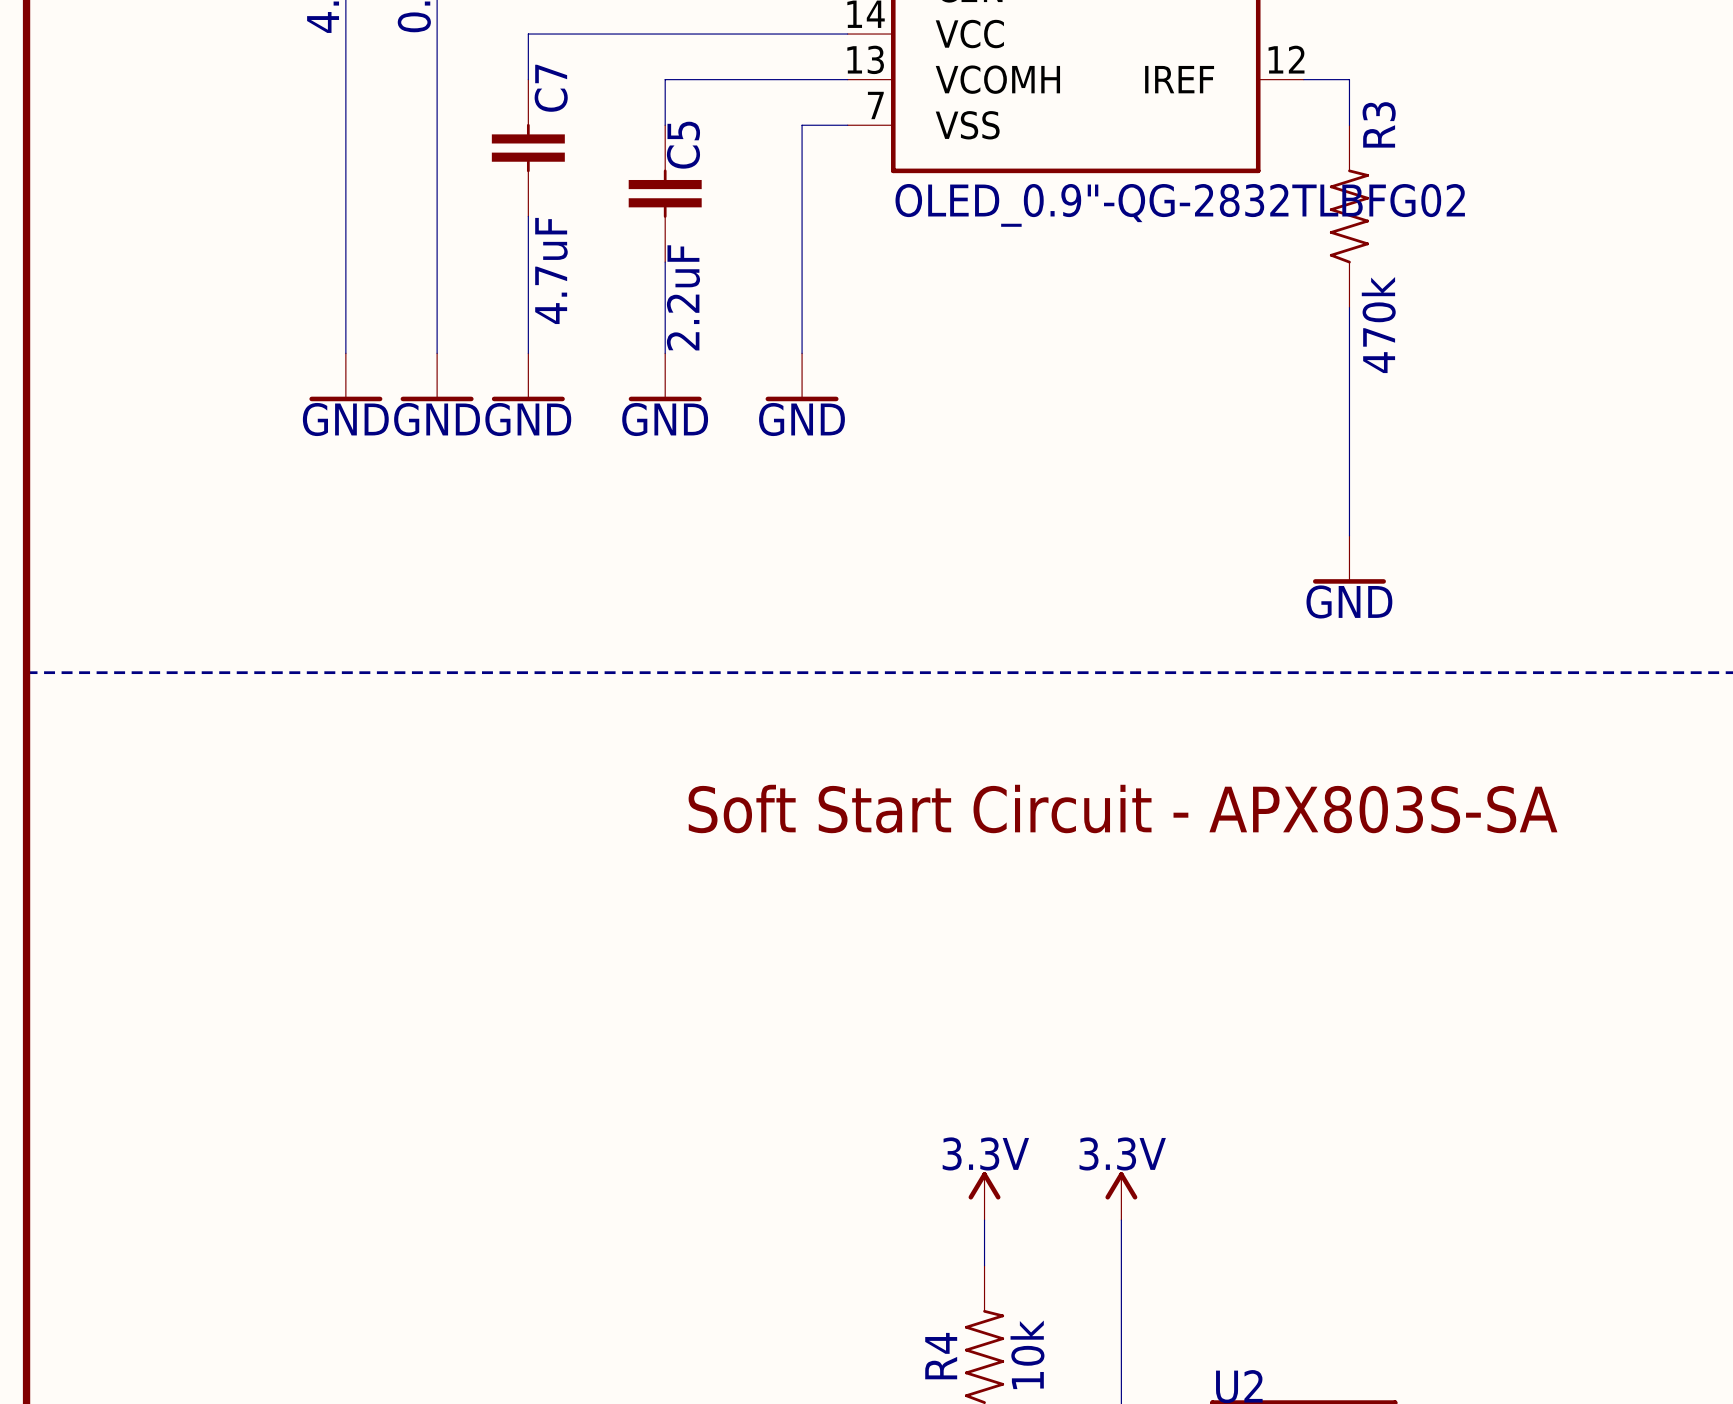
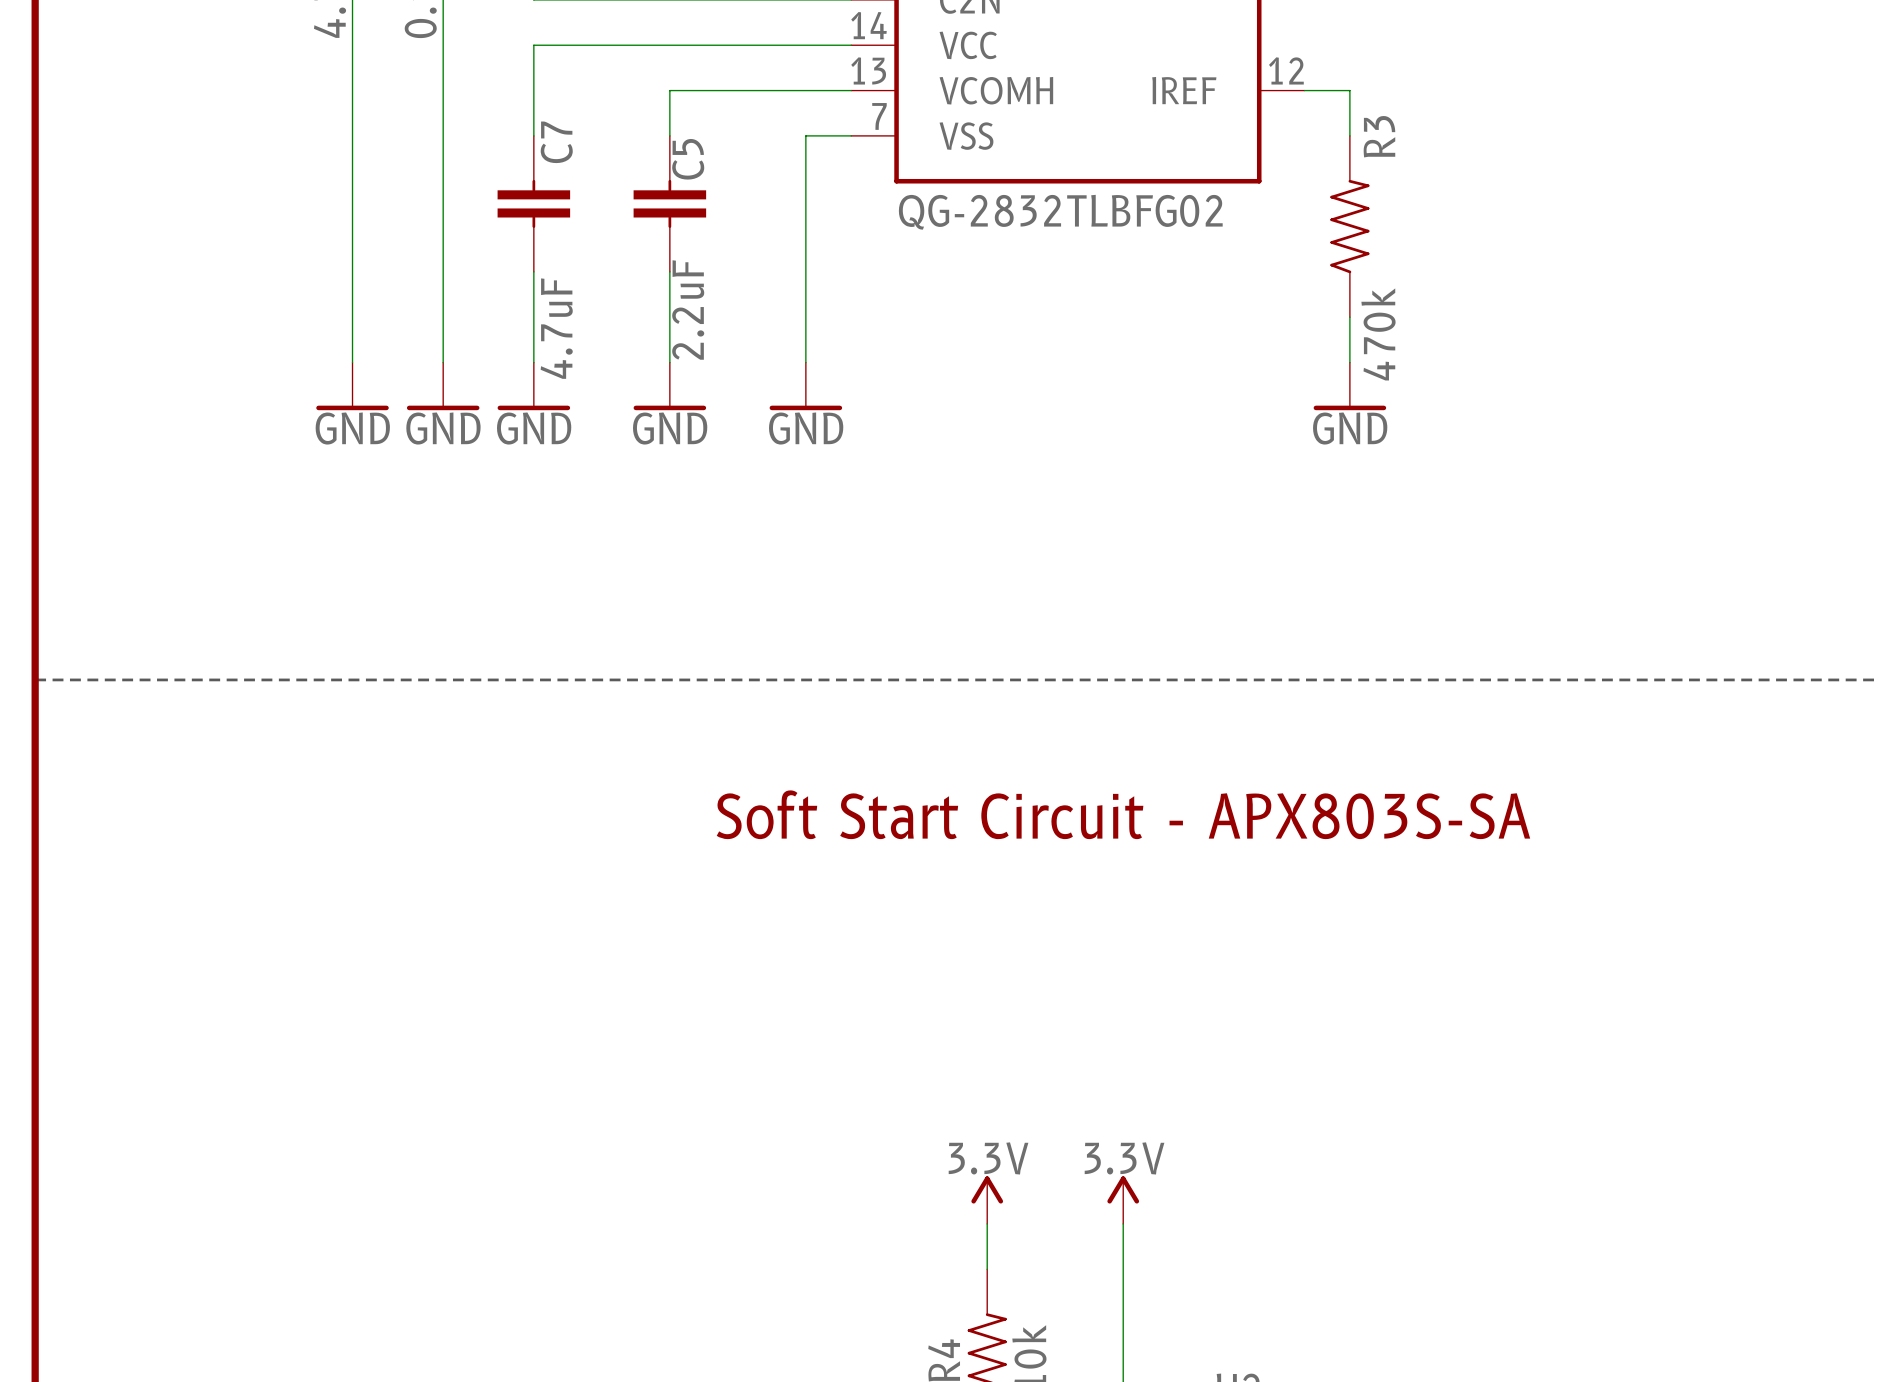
C7 position: (528, 148) -> (533, 203)
part value: OLED_0.9"-QG-2832TLBFG02 (1180, 205) -> QG-2832TLBFG02 (1060, 212)
wire: (1349, 353) (1349, 535) -> none
power symbol position: GND (1349, 559) -> GND (1349, 386)

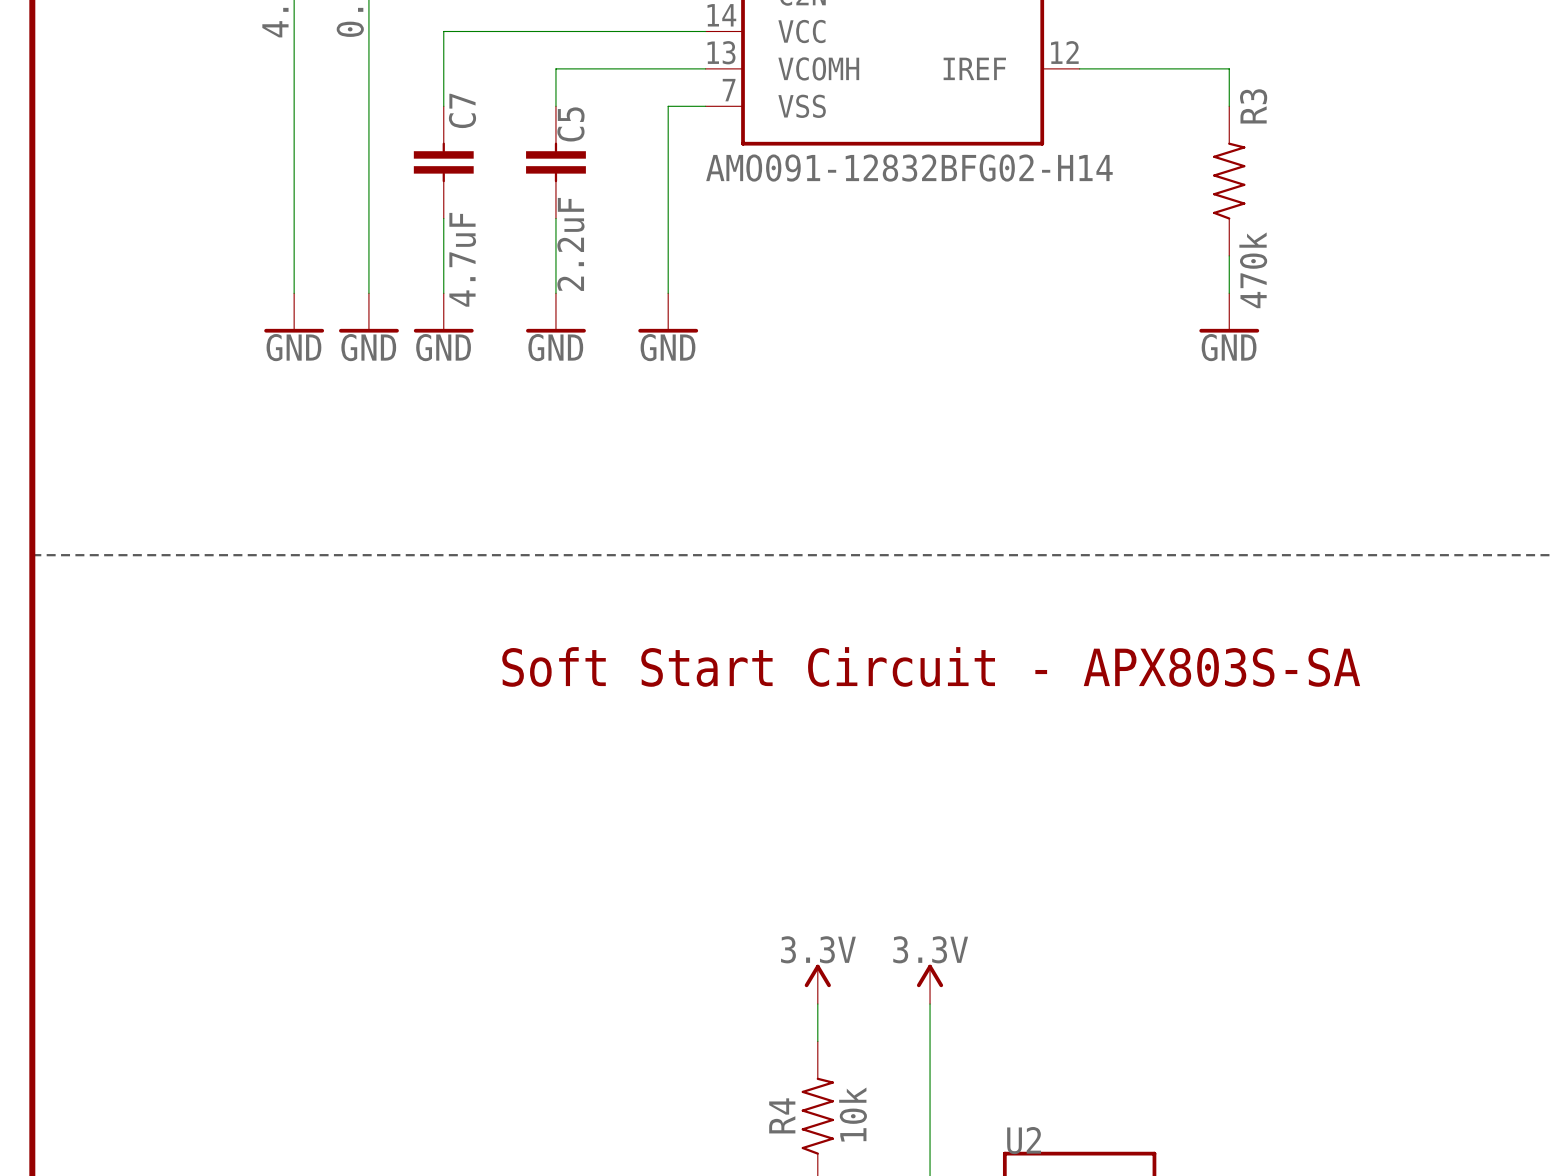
wire: (1349, 90) (1349, 135) -> (1117, 68) (1229, 68) (1229, 106)
part value: QG-2832TLBFG02 (1060, 212) -> AMO091-12832BFG02-H14 (909, 168)
R3 position: (1349, 226) -> (1229, 181)
wire: (1349, 317) (1349, 362) -> (1229, 255) (1229, 293)
power symbol position: GND (1349, 386) -> GND (1229, 312)

